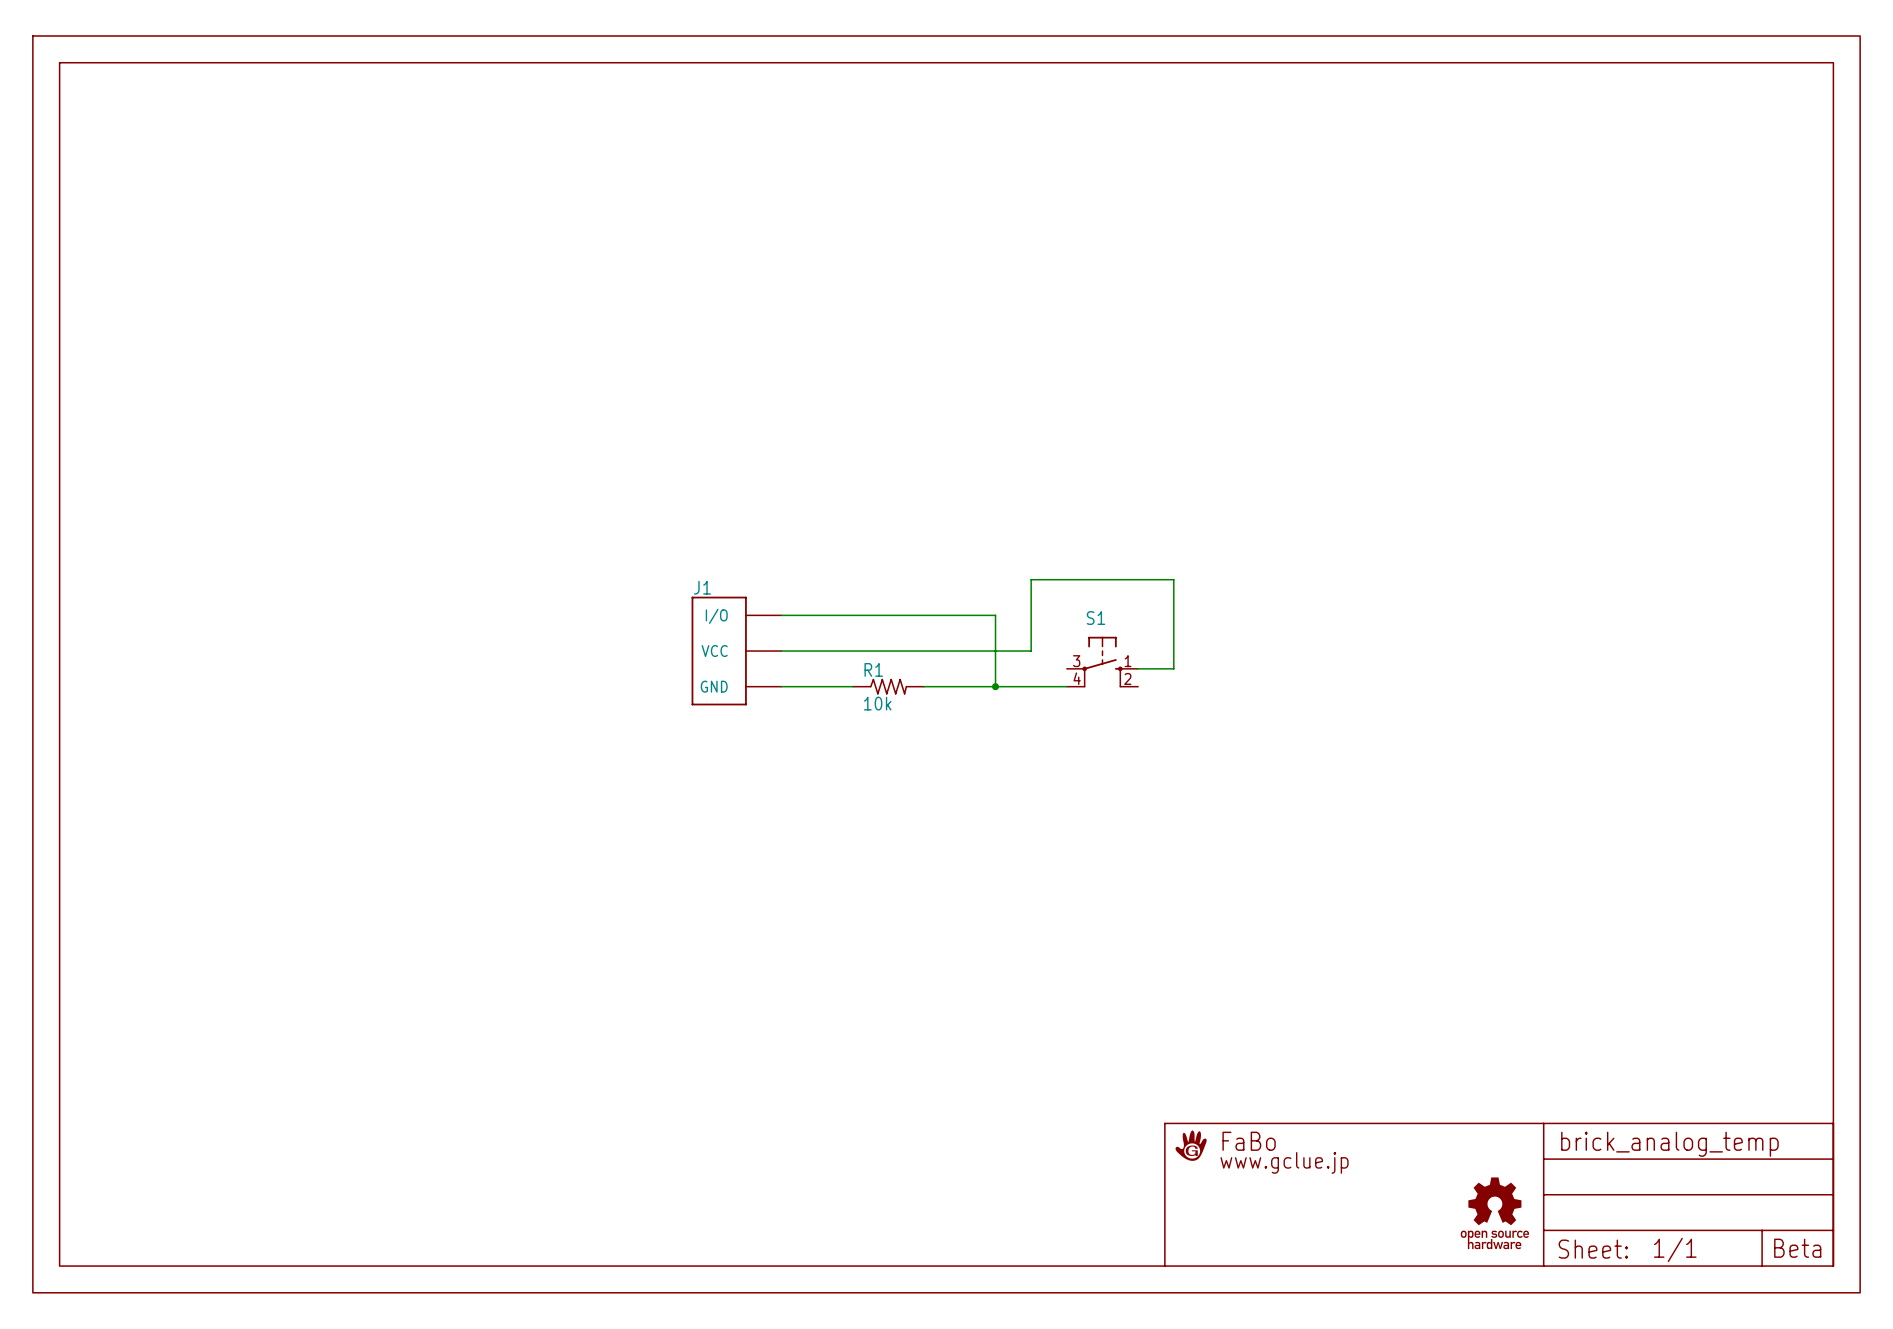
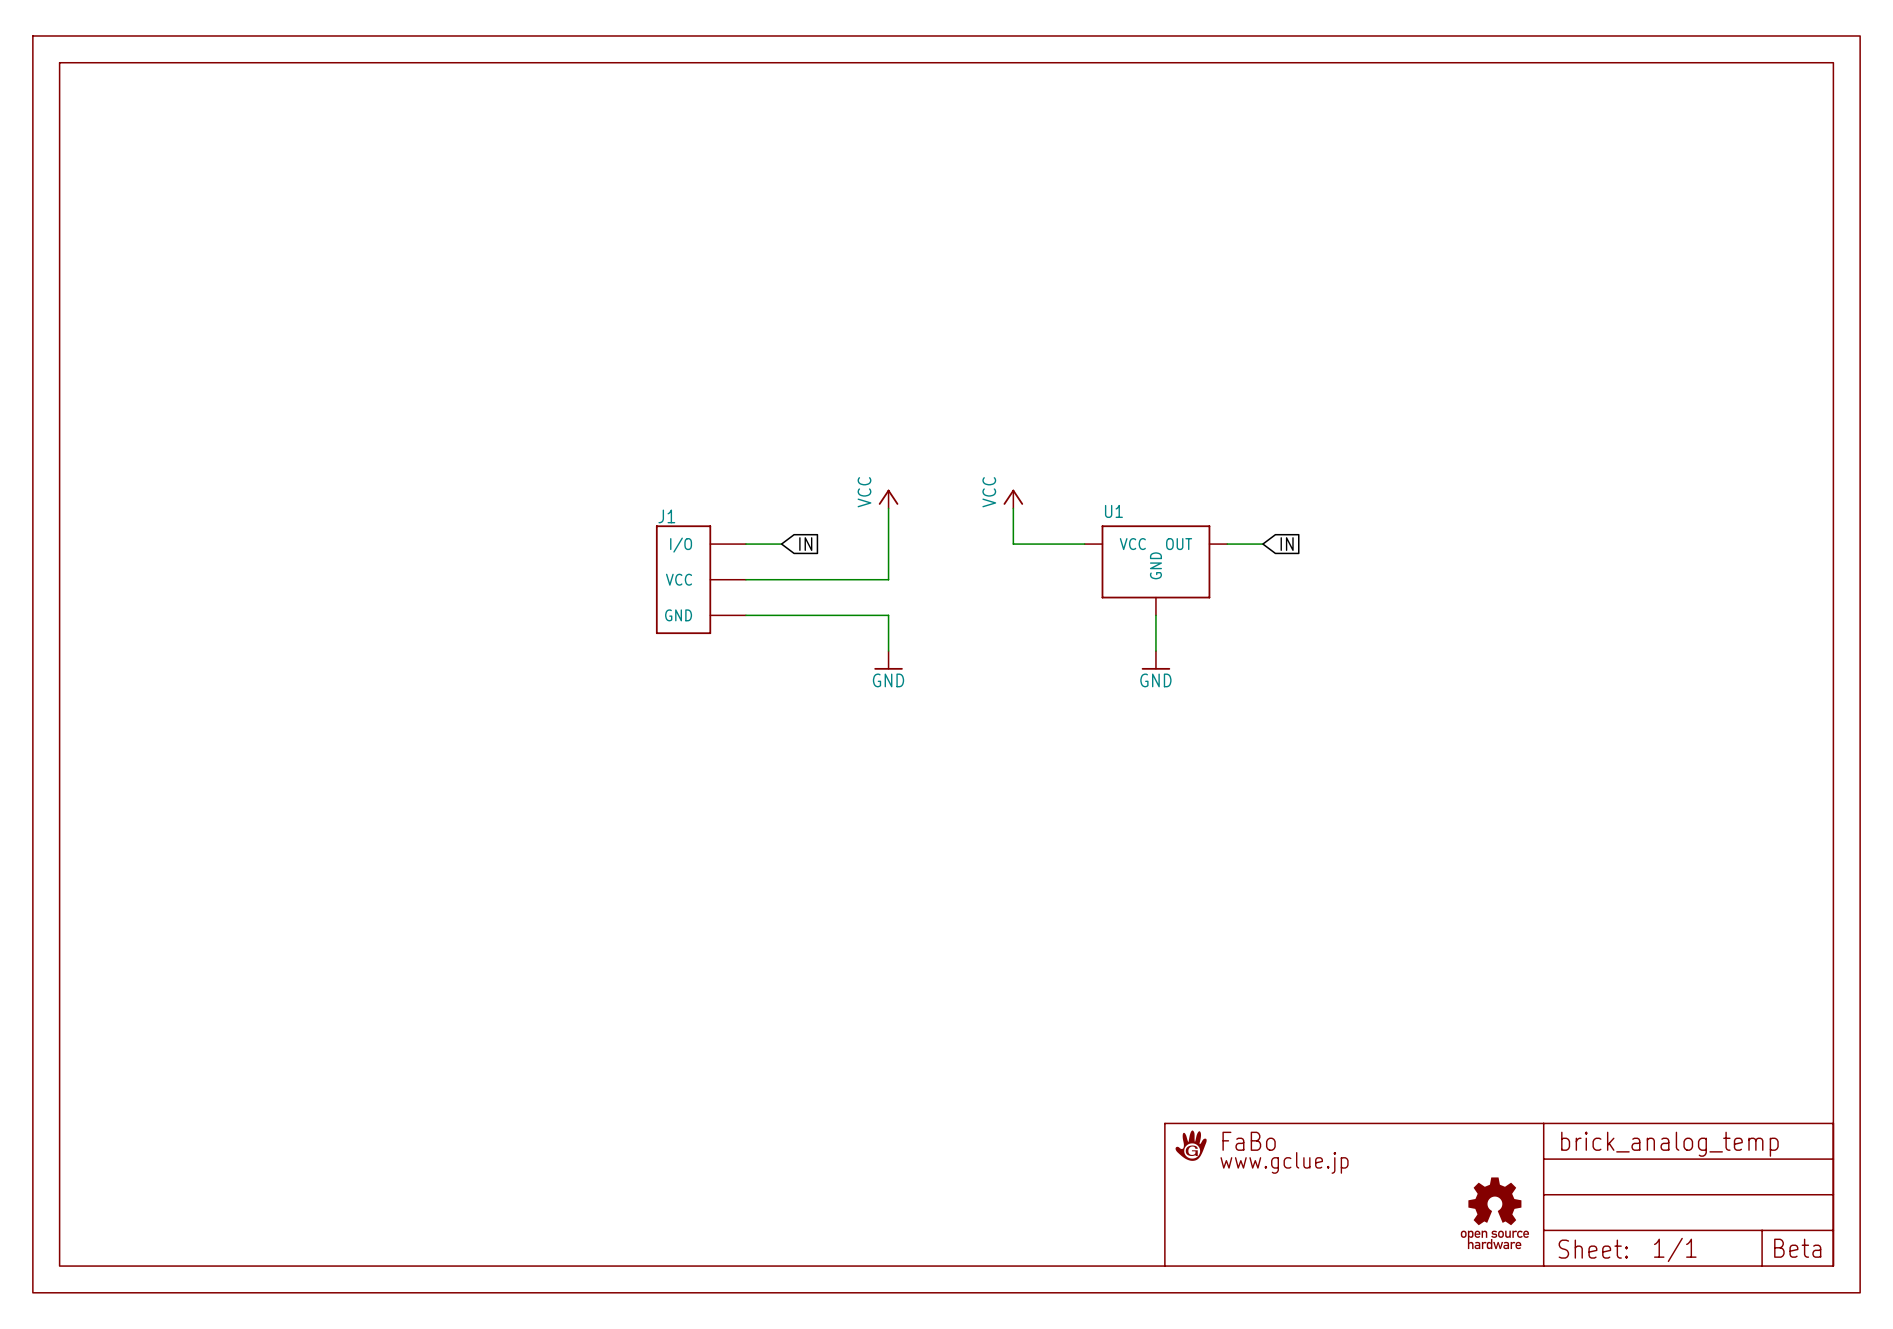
power symbol: none -> VCC (888, 499)
power symbol: none -> VCC (1013, 499)
wire: none -> (888, 508) (888, 579) (745, 579)
wire: none -> (1013, 508) (1013, 544) (1084, 544)
wire: none -> (745, 544) (781, 544)
global label: none -> IN (805, 544)
wire: none -> (1227, 544) (1262, 544)
global label: none -> IN (1287, 544)
U1: none -> (1155, 570)
wire: (888, 615) (995, 615) (995, 686) -> (888, 615) (888, 651)
wire: none -> (1155, 615) (1155, 651)
J1 position: (736, 651) -> (700, 579)
wire: (781, 651) (1031, 651) (1031, 579) (1173, 579) (1173, 668) (1138, 668) -> none
power symbol: none -> GND (888, 660)
power symbol: none -> GND (1155, 660)
S1: (1102, 661) -> none
wire: (781, 686) (852, 686) -> none
R1: 10k (888, 686) -> none
wire: (924, 686) (1066, 686) -> none
junction: (995, 686) -> none

